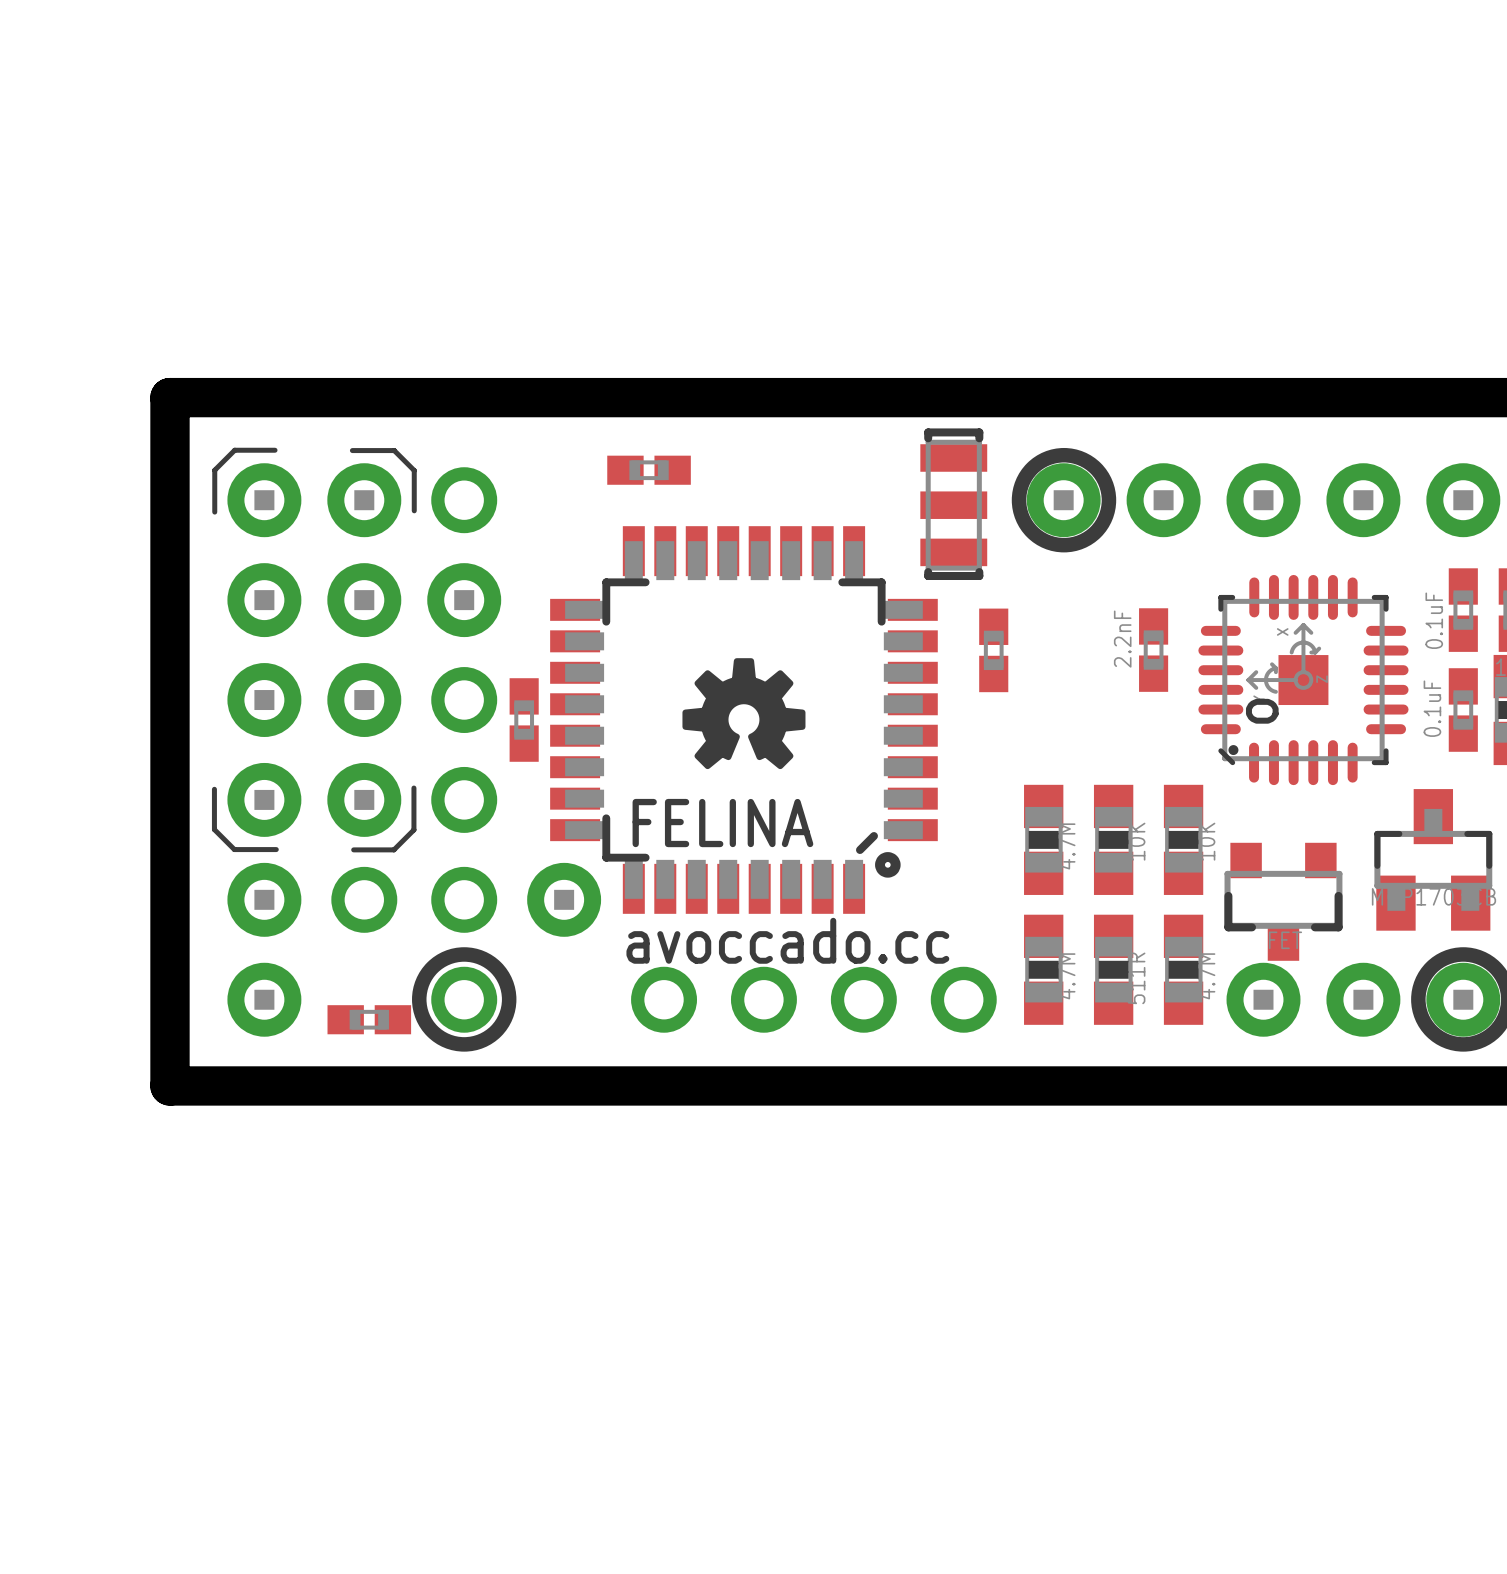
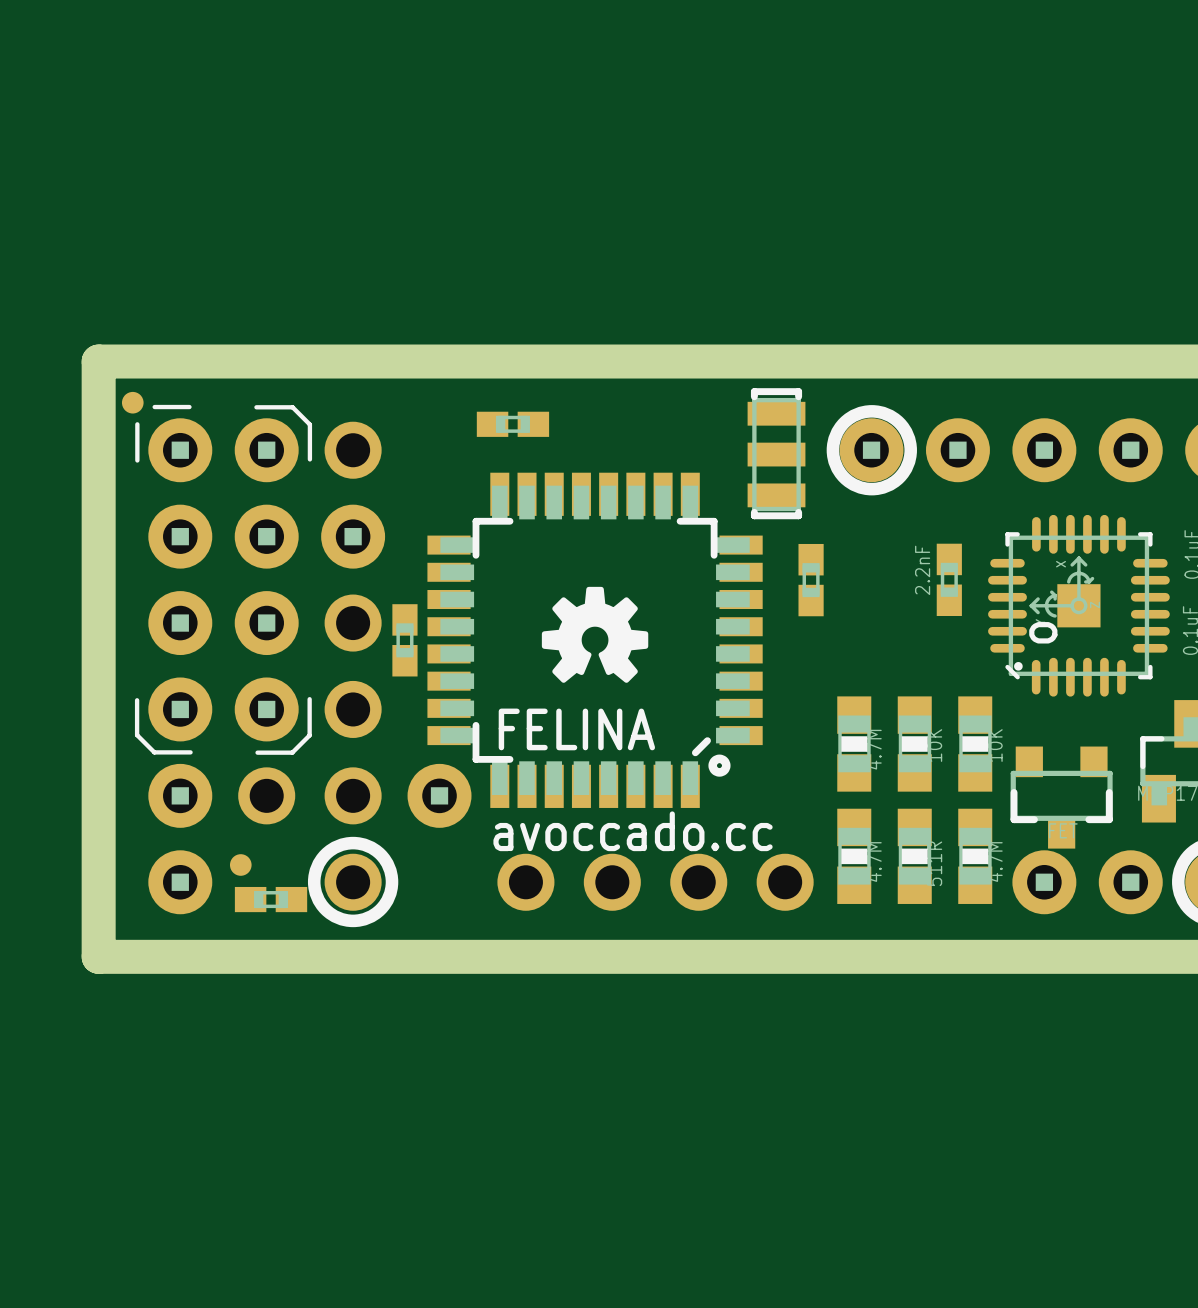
part: none -> (132, 402)
line: (234, 450) (214, 470) -> none
part: none -> (240, 864)

